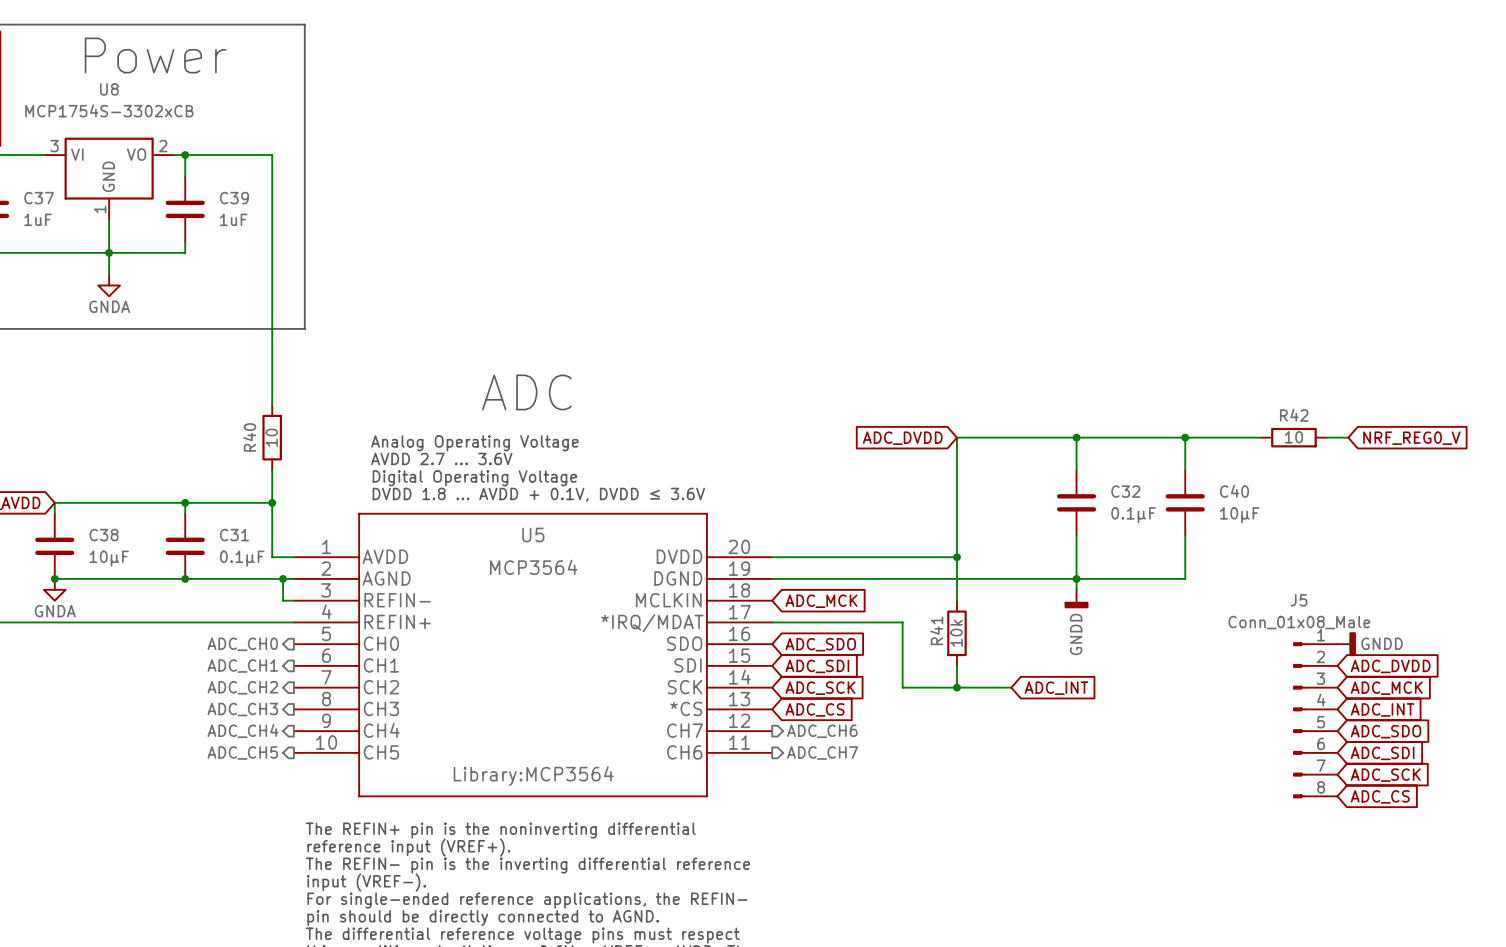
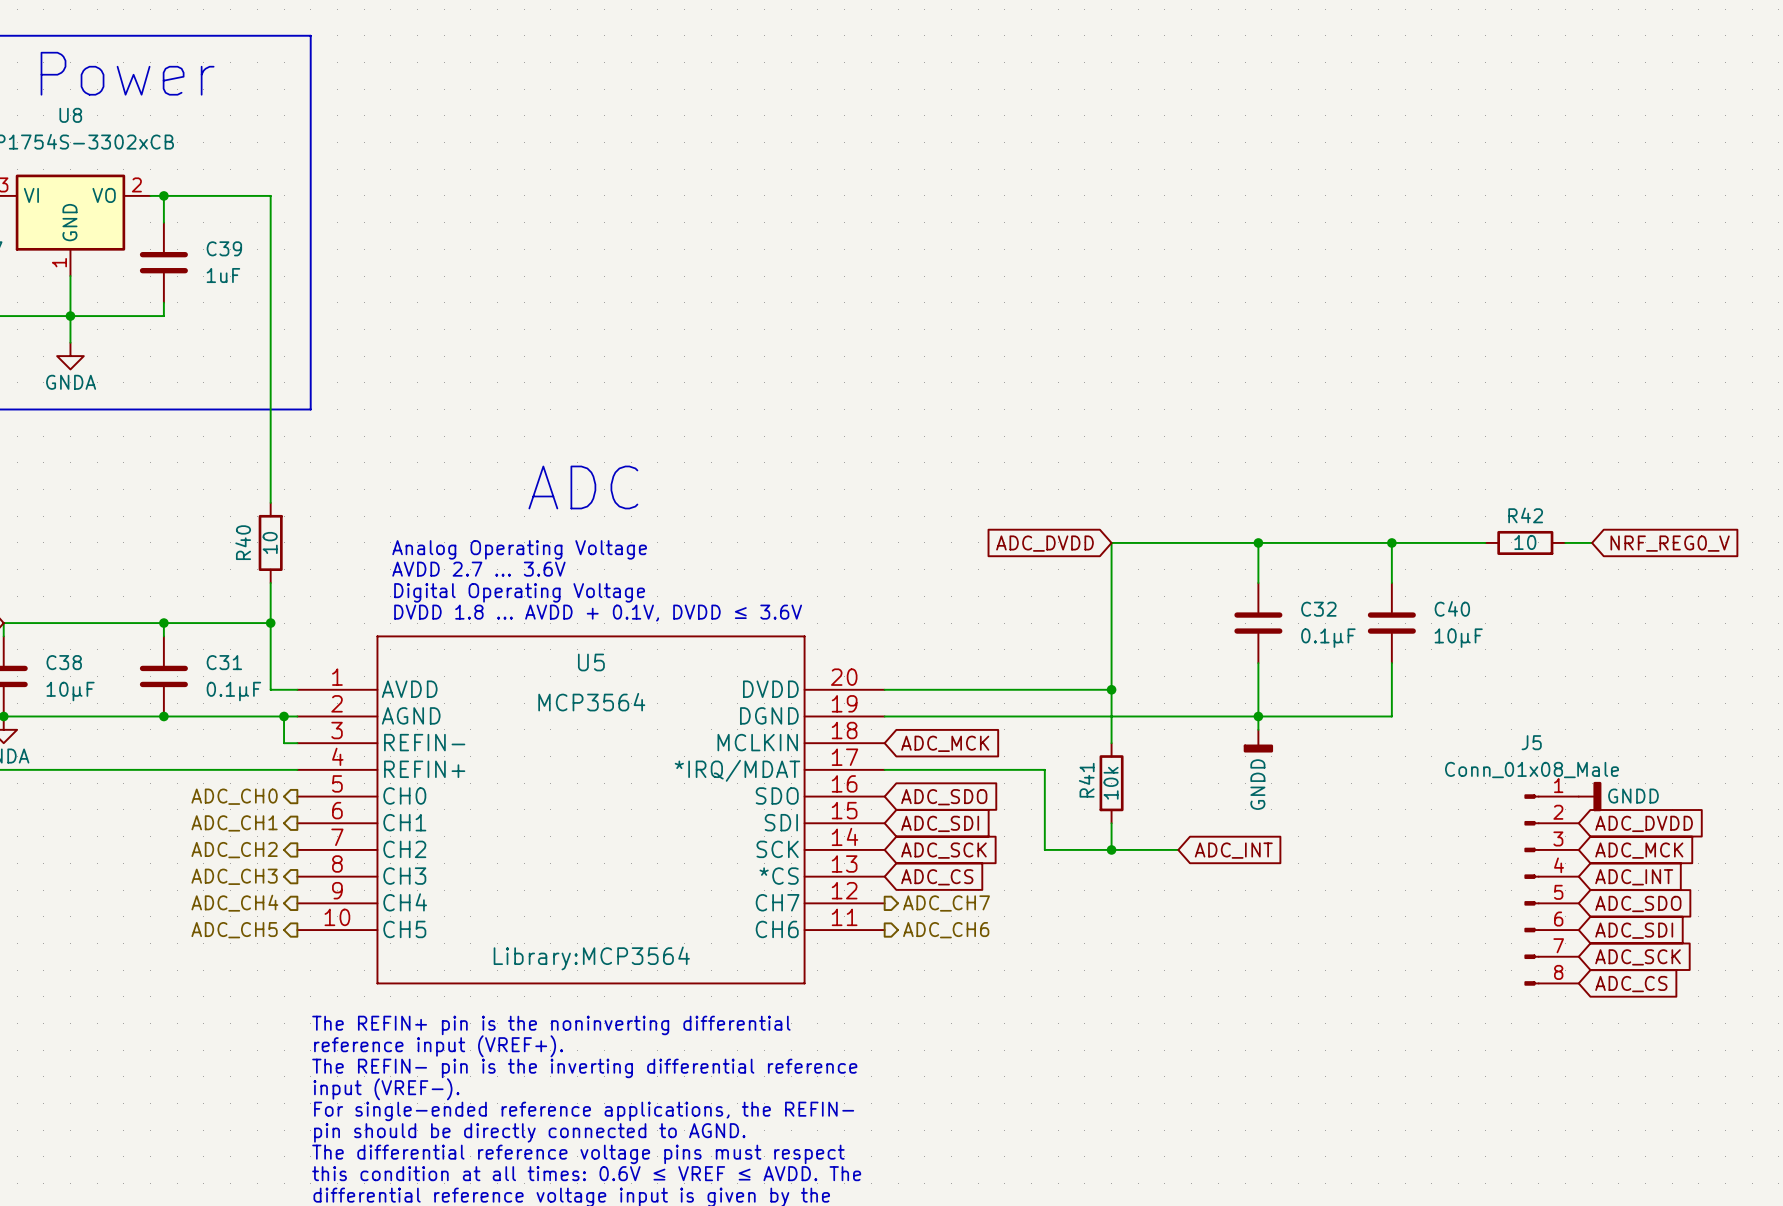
hierarchical label: ADC_CH6 (822, 731) -> ADC_CH7 (946, 903)
hierarchical label: ADC_CH7 (822, 752) -> ADC_CH6 (946, 930)

